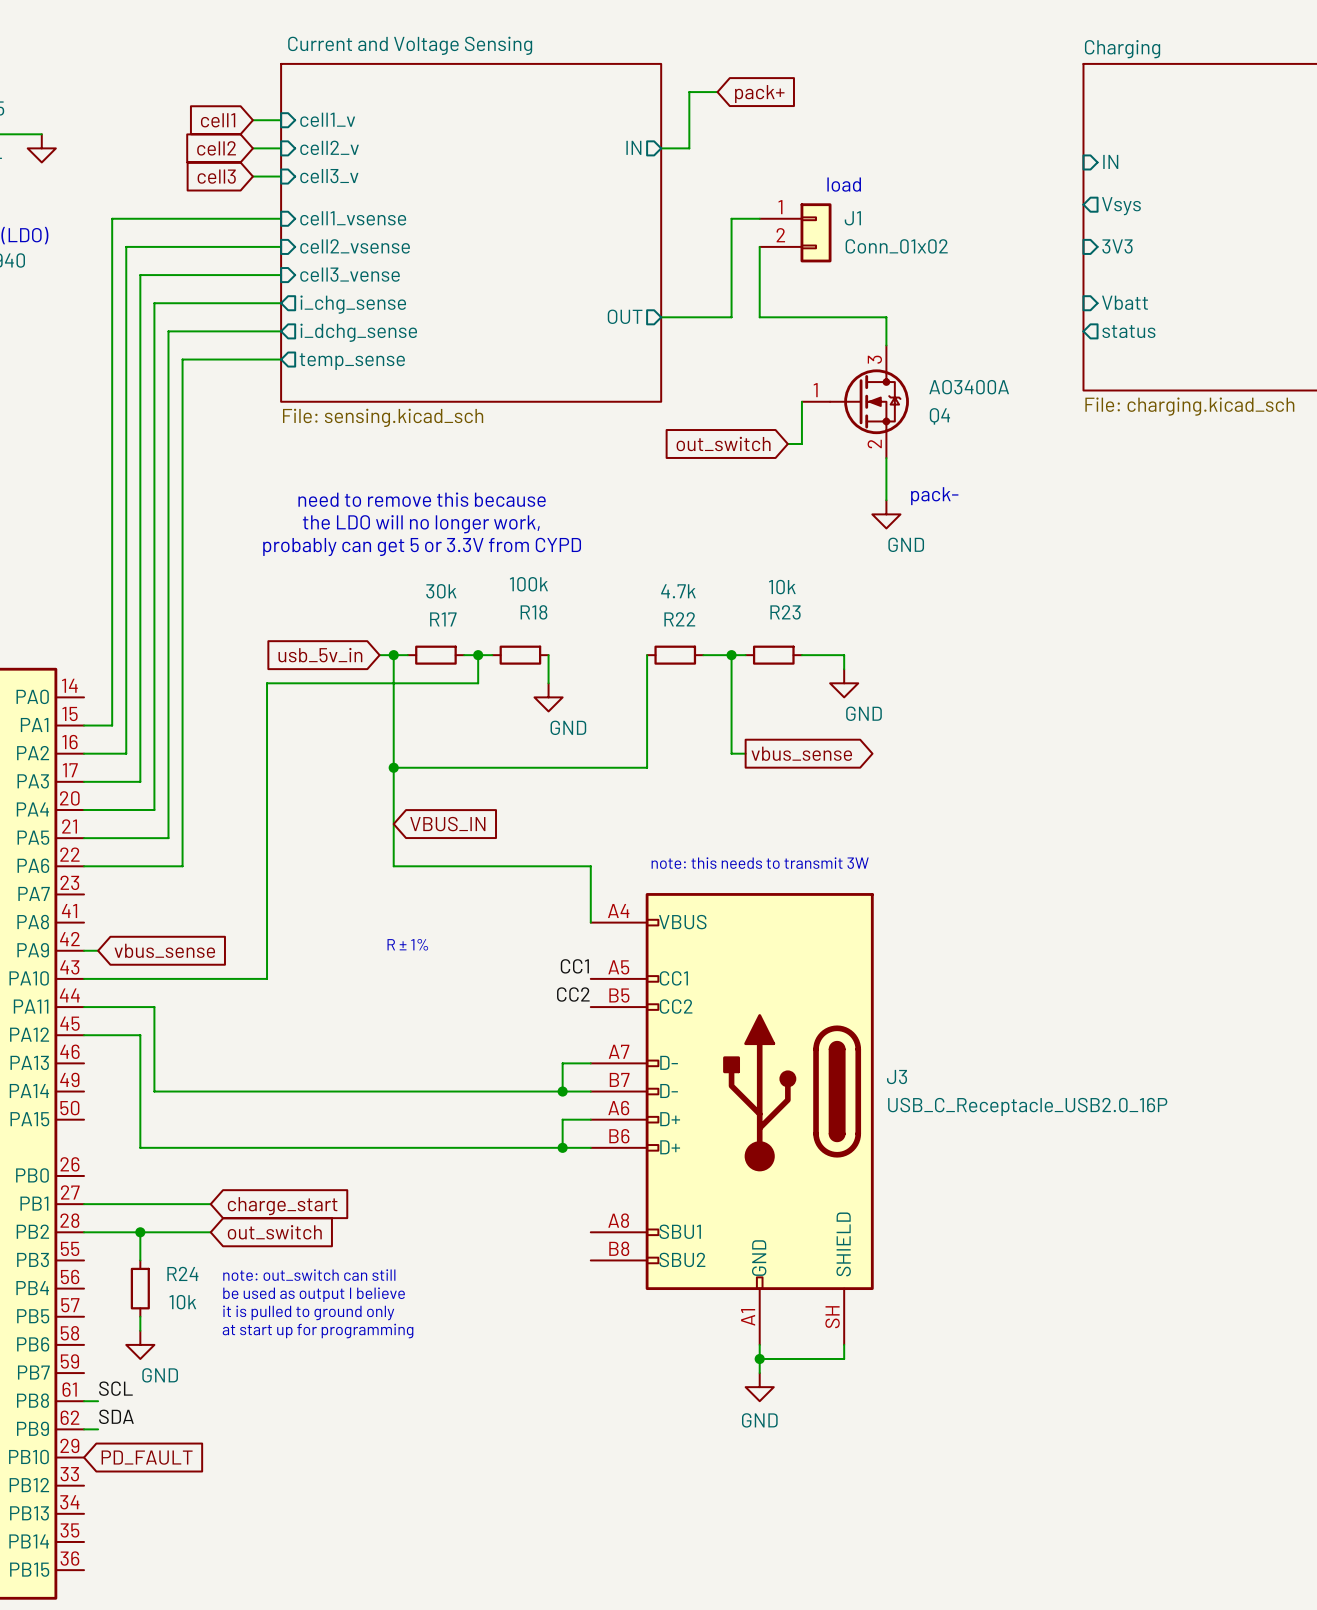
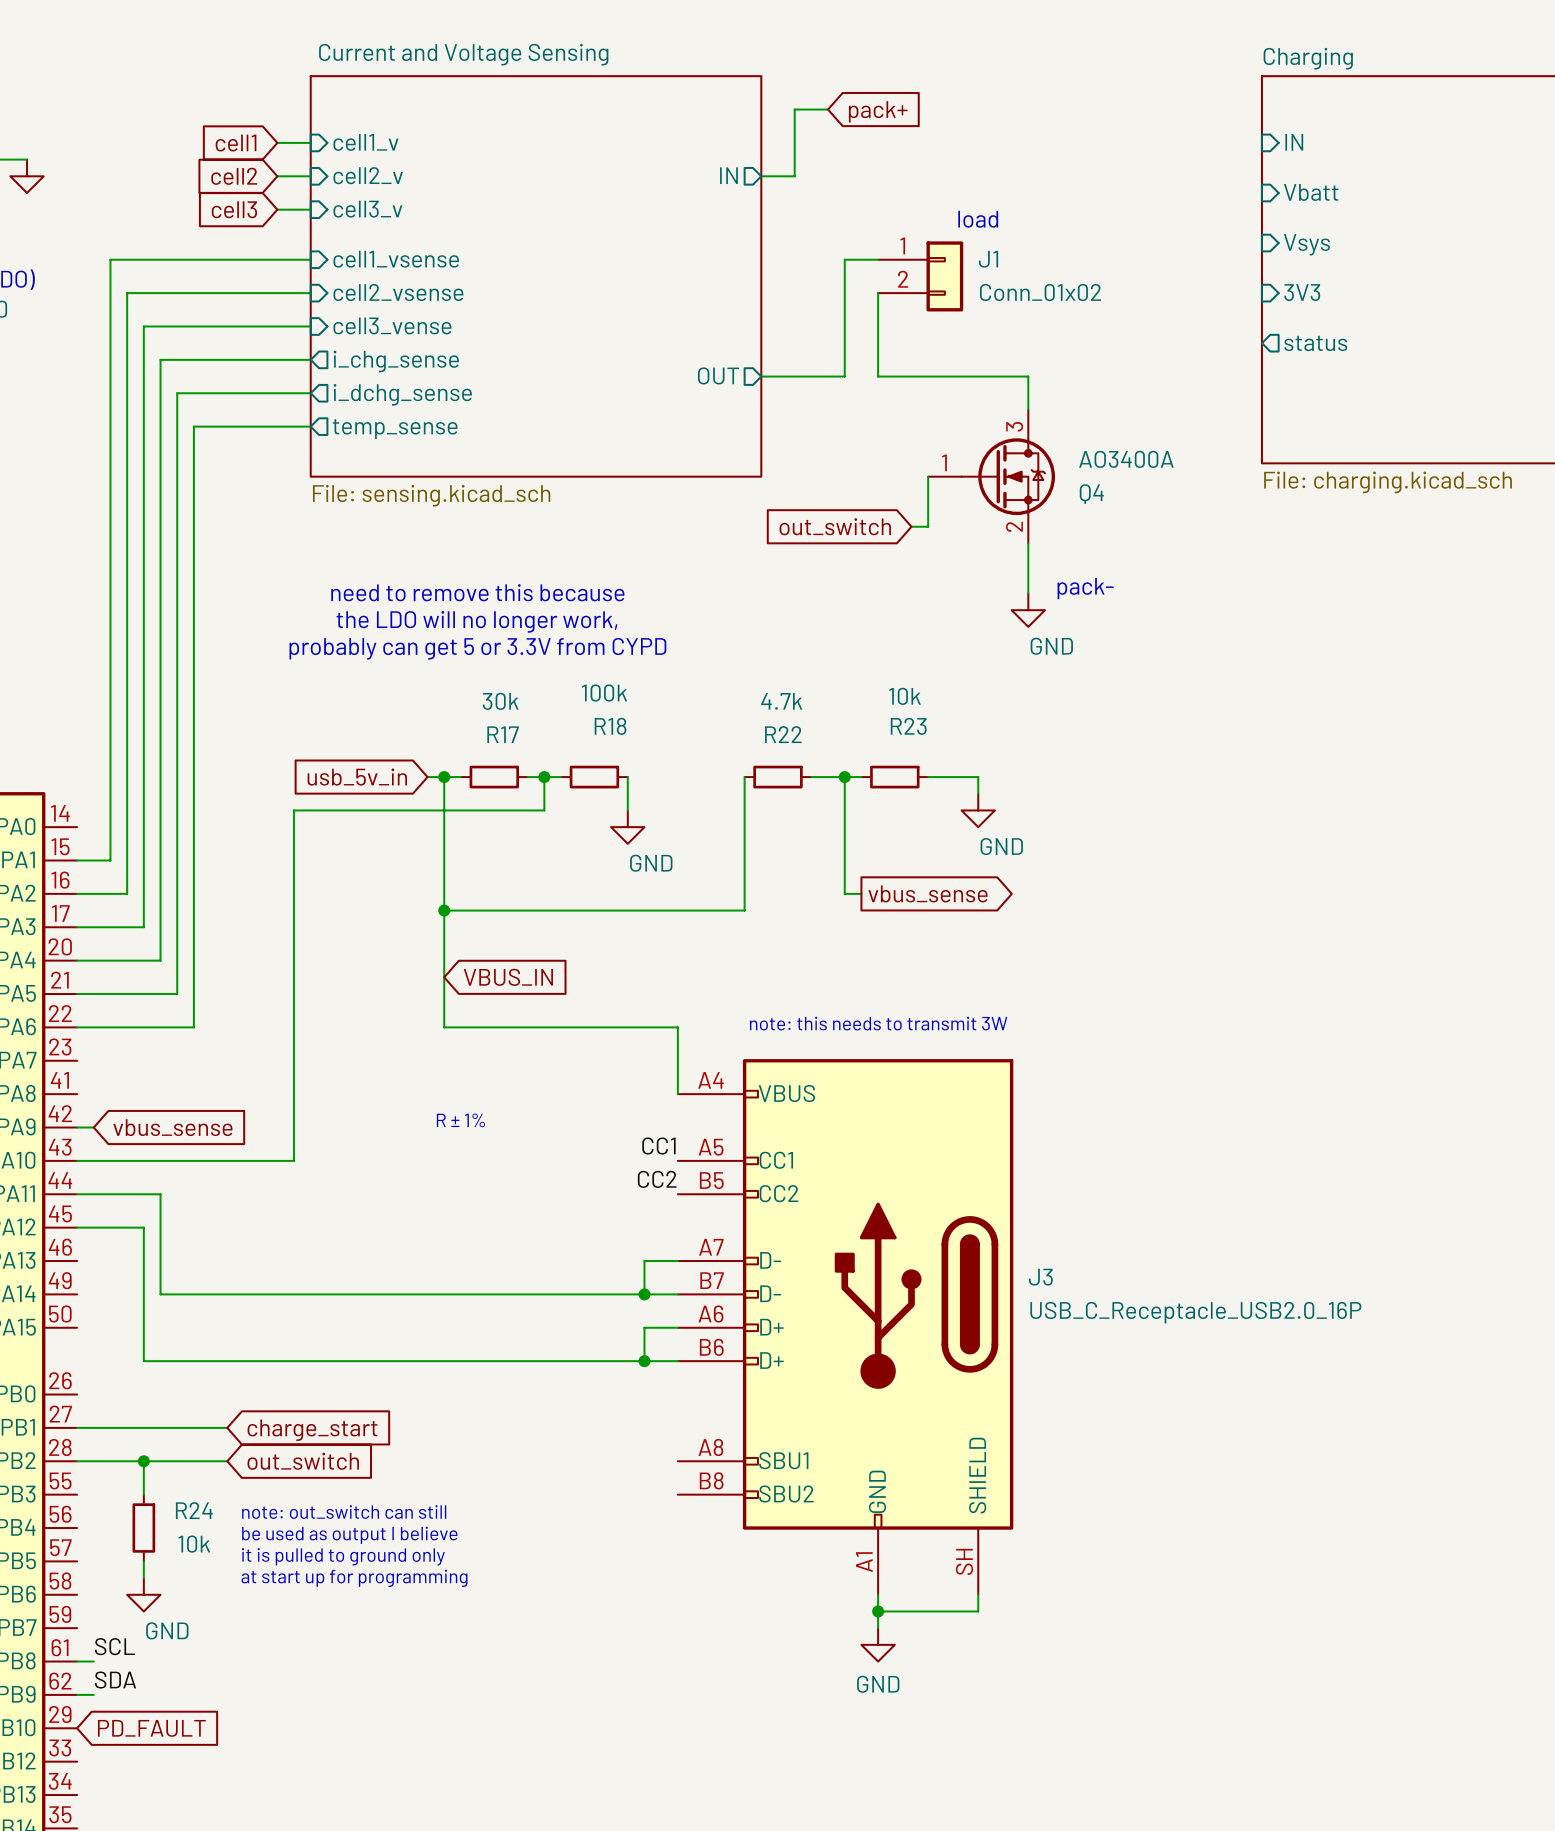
sheet pin: none -> IN (1294, 142)
sheet pin: IN (1110, 161) -> Vbatt (1311, 192)
sheet pin shape: output (1121, 206) -> input (1306, 244)
sheet pin: Vbatt (1125, 302) -> none
sheet pin position: status (1128, 331) -> status (1315, 343)

